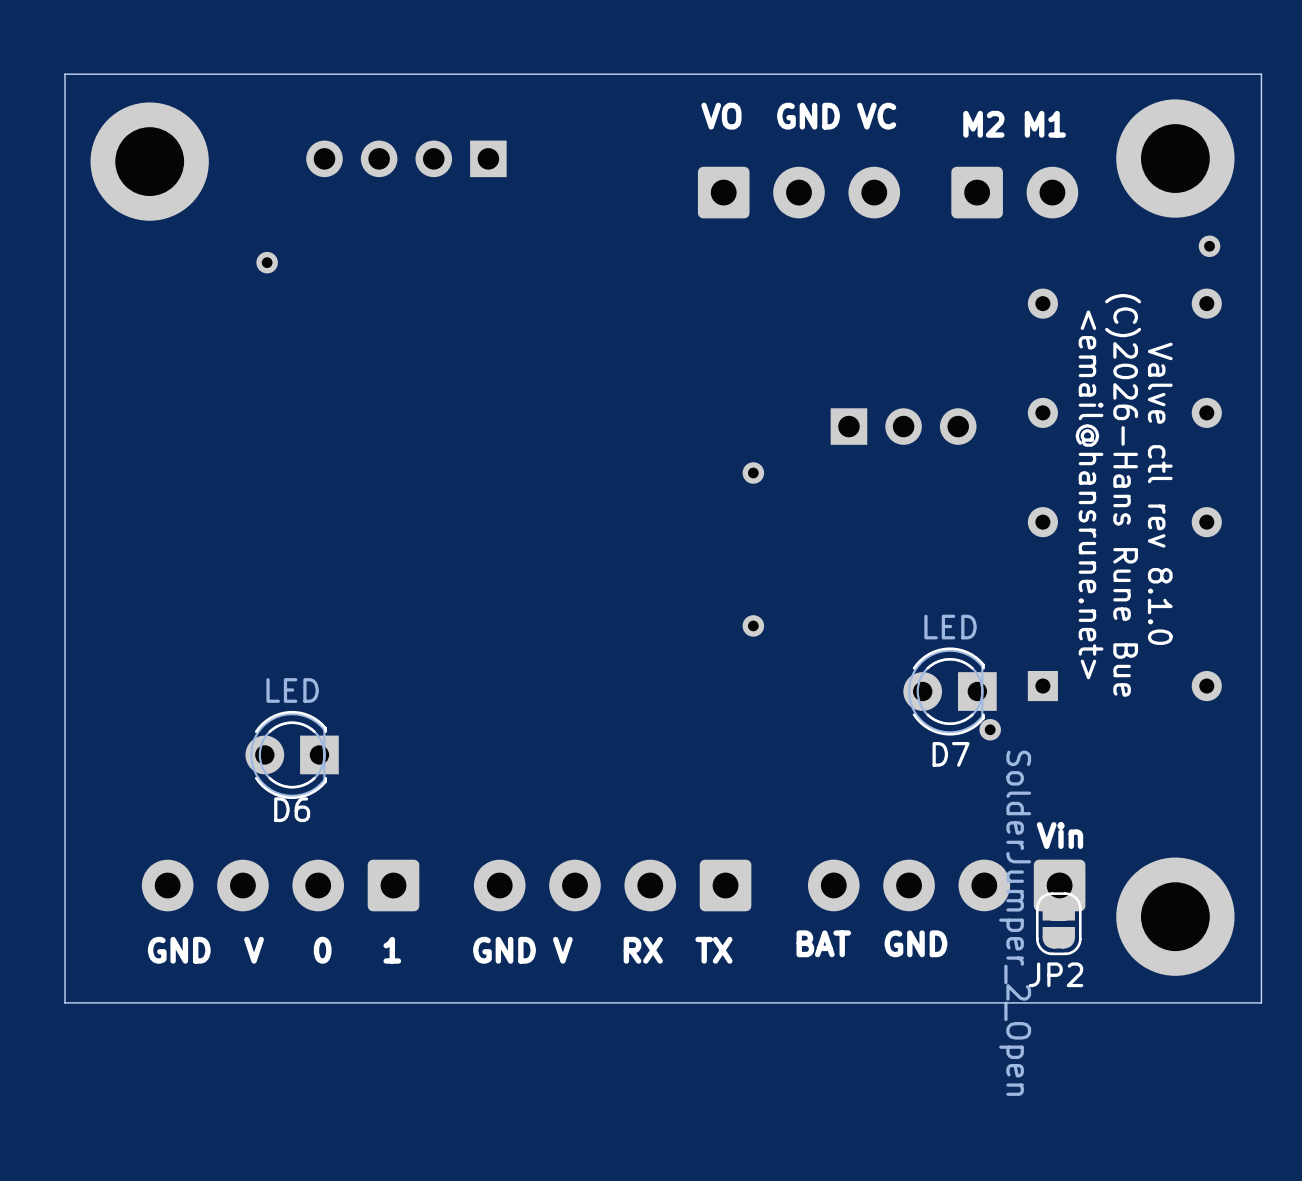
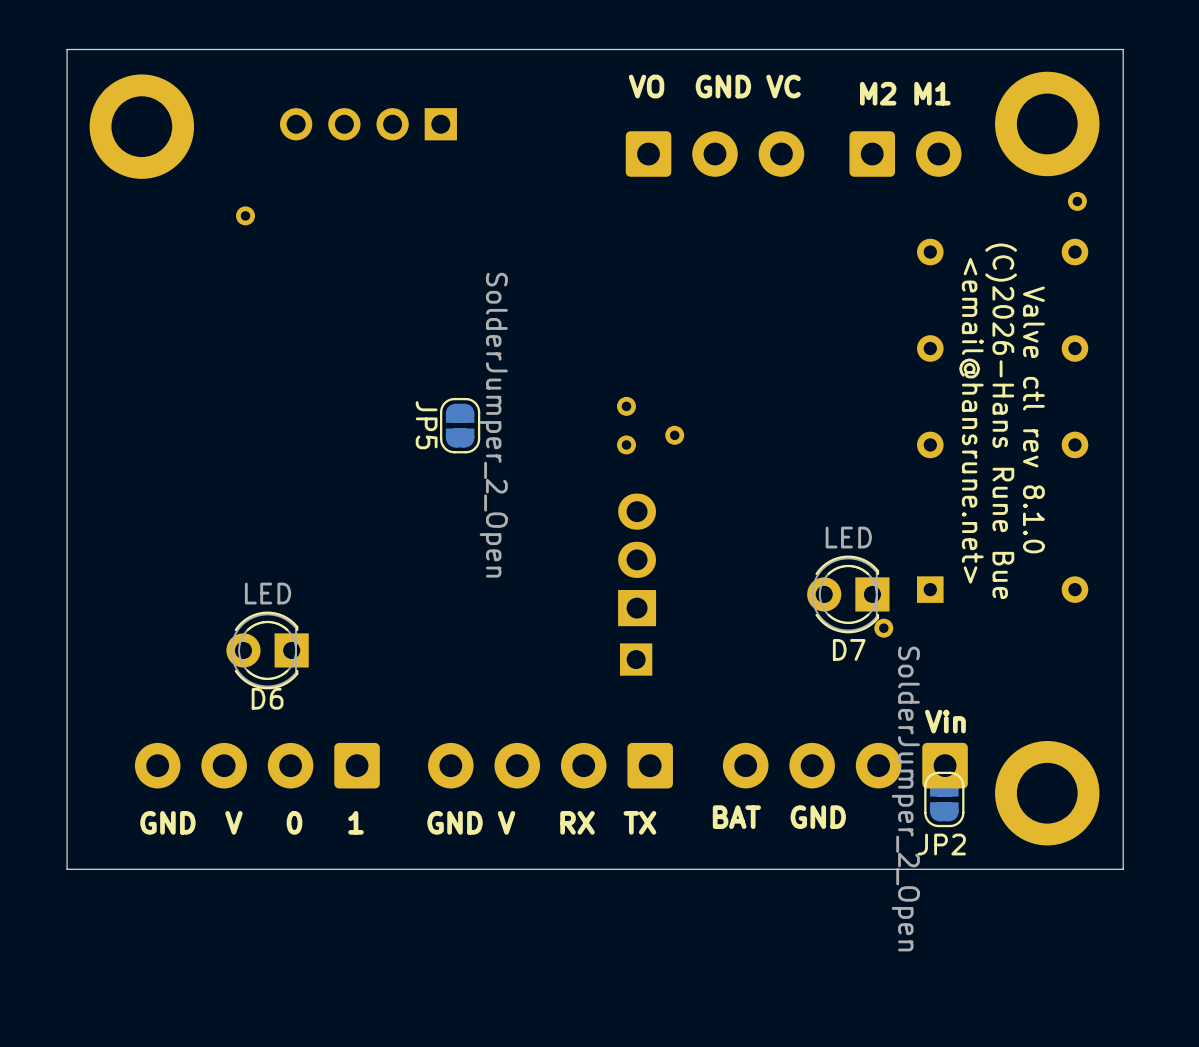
part: (903, 426) -> none
part: (753, 472) -> none
part: none -> (626, 406)
JP5: none -> SolderJumper_2_Open (460, 425)
part: none -> (674, 435)
part: none -> (626, 444)
part: (753, 625) -> none
part: none -> (637, 559)
part: none -> (636, 659)

